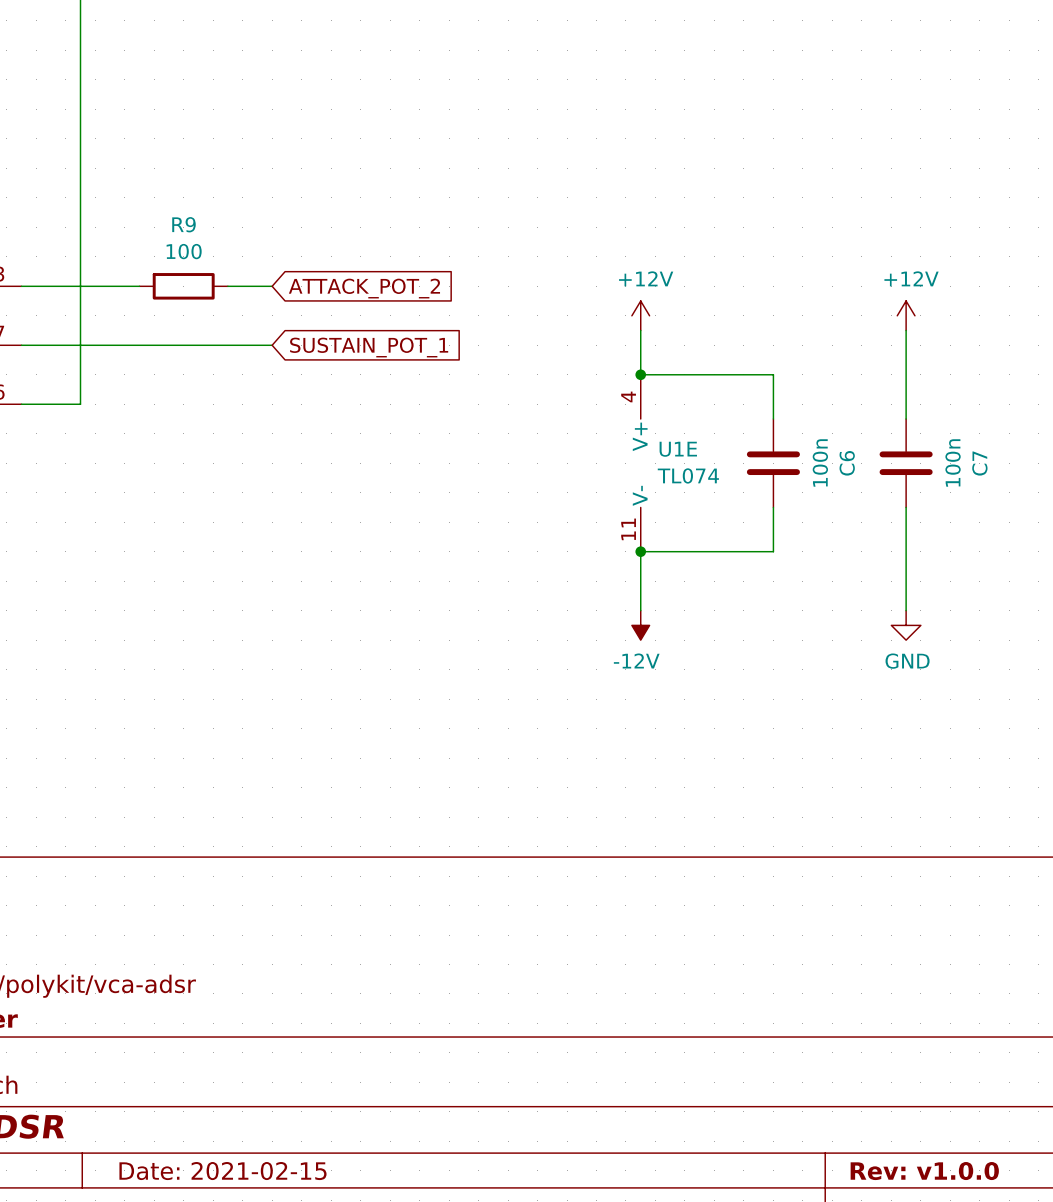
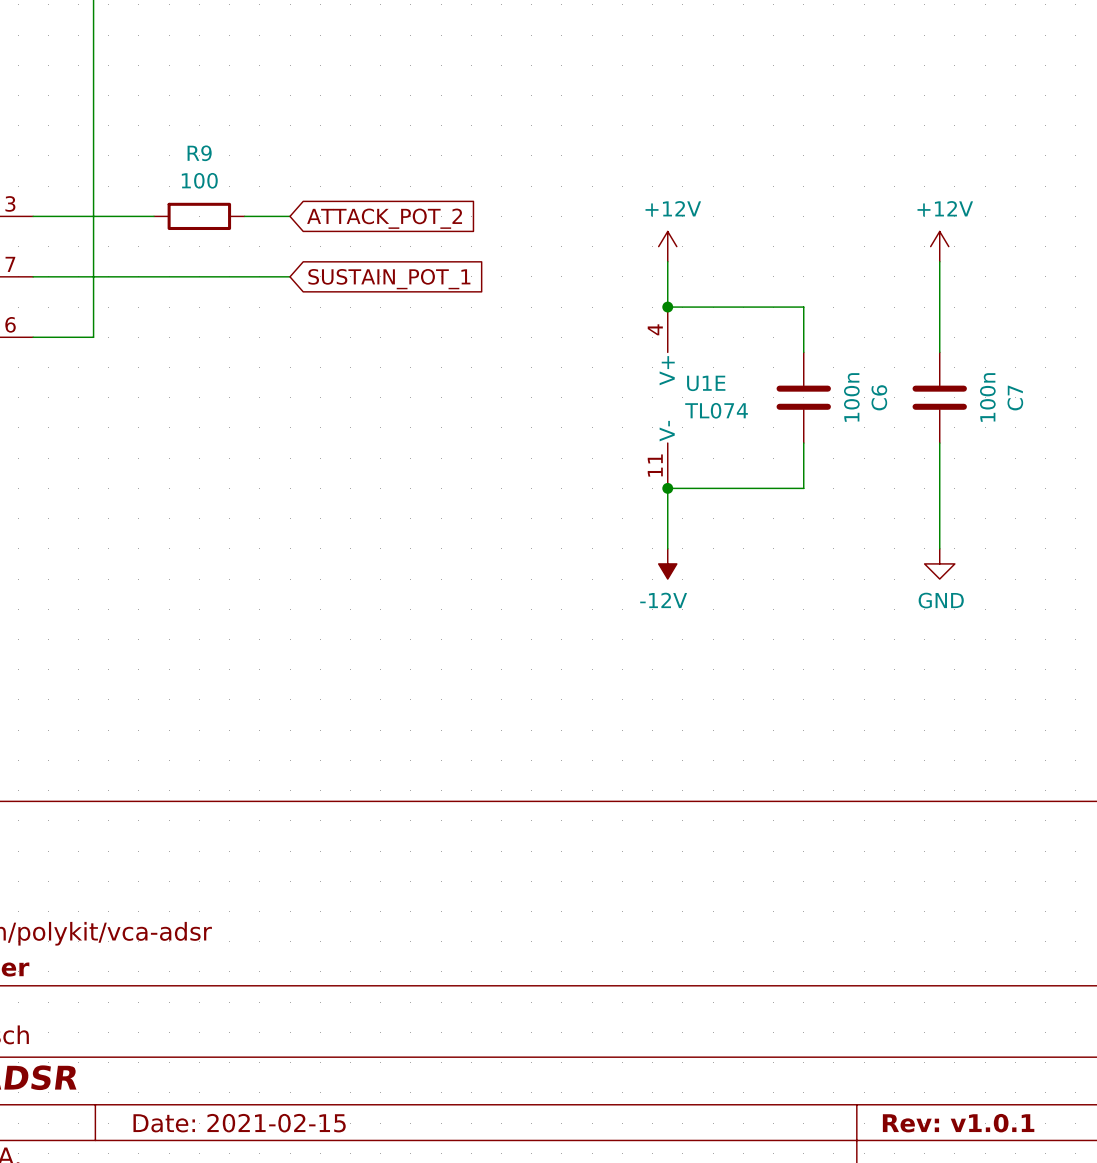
title block: Rev: v1.0.0 (924, 1171) -> Rev: v1.0.1 (958, 1123)

